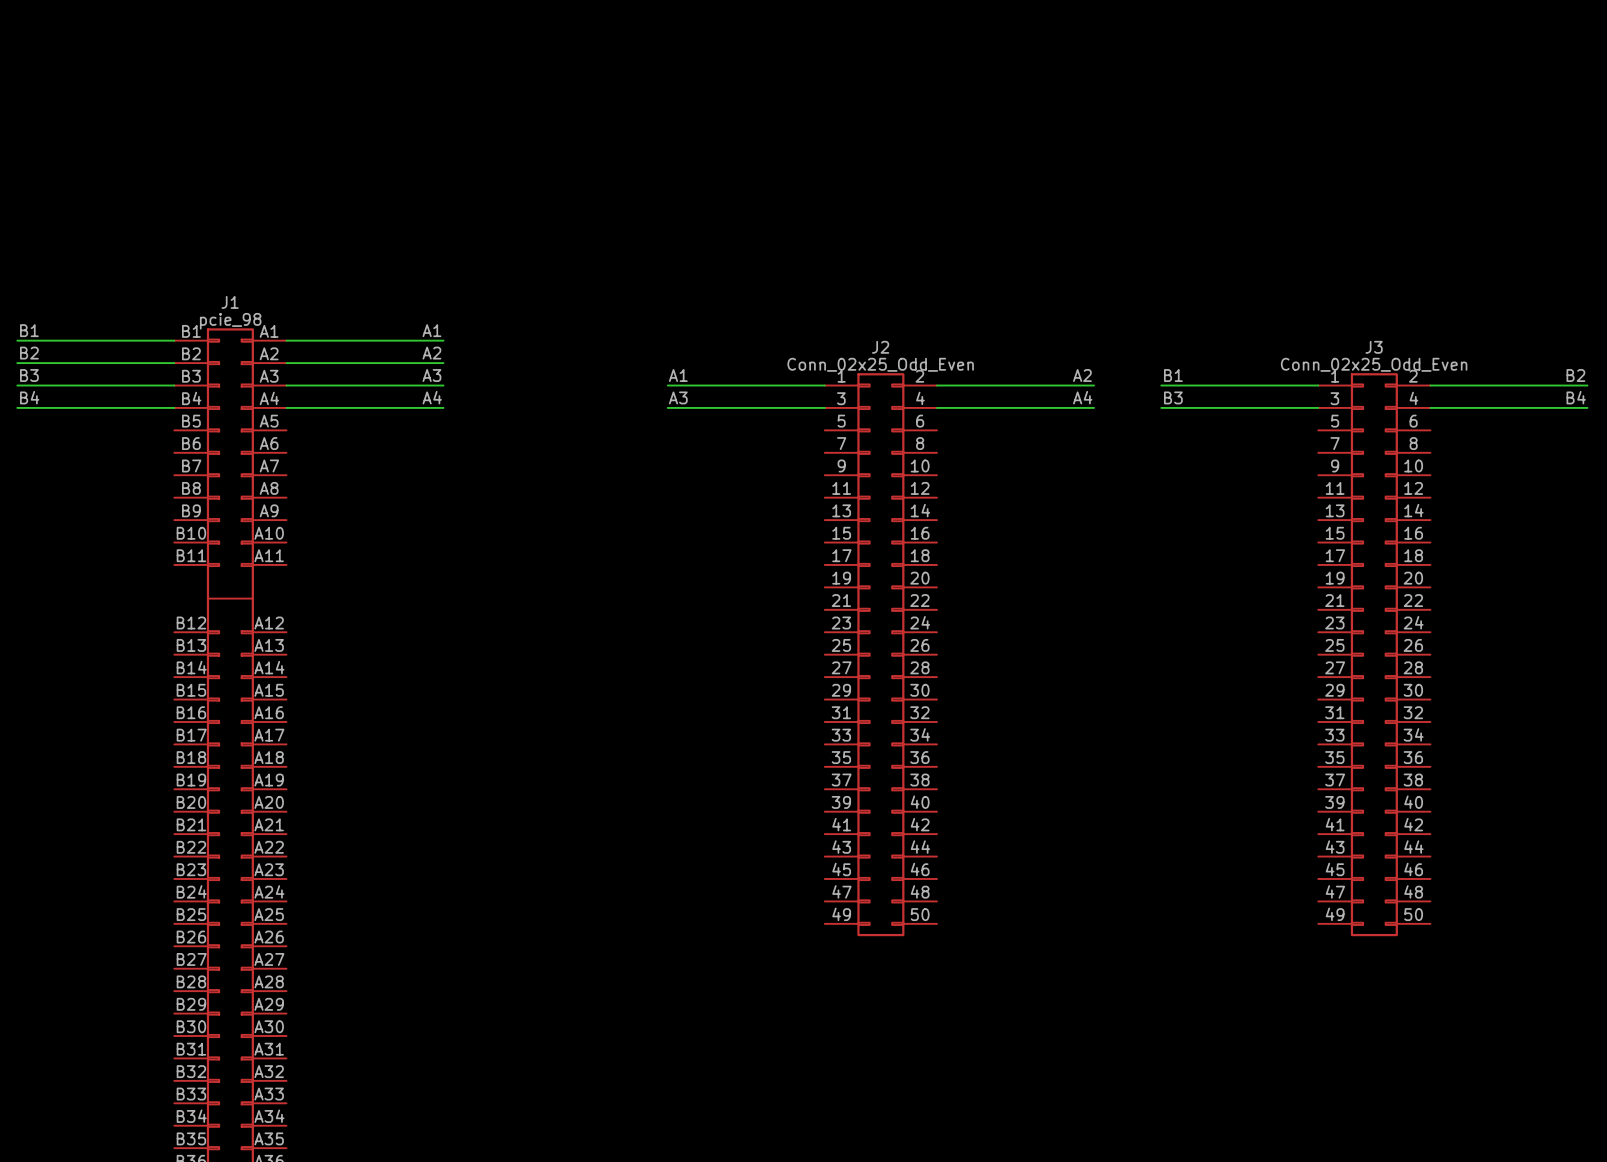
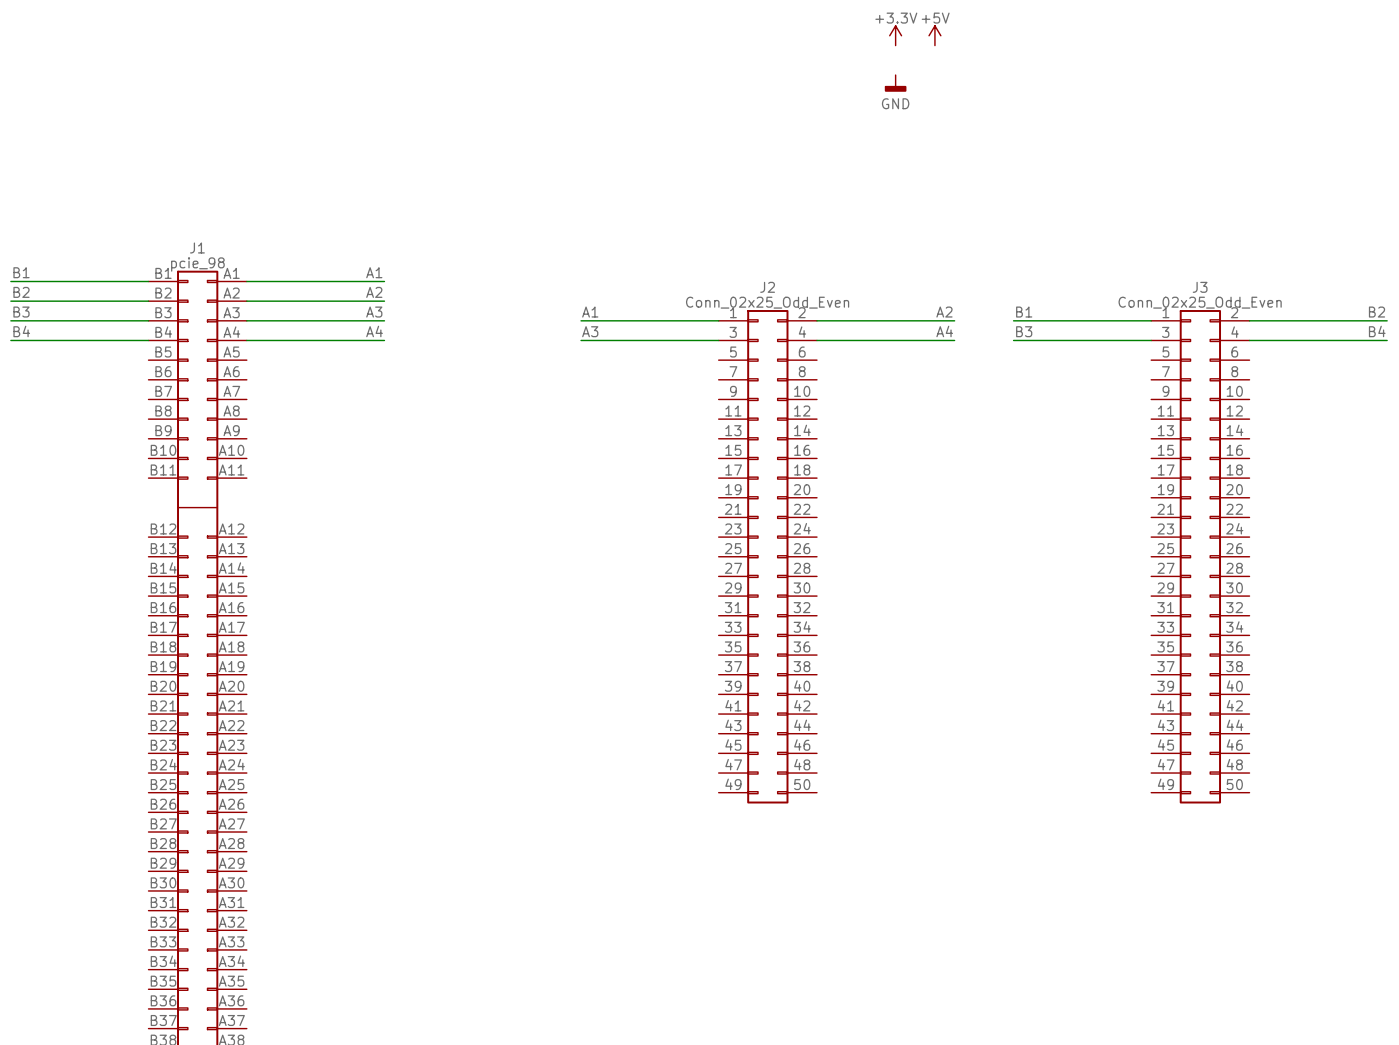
power symbol: none -> +3.3V (895, 35)
power symbol: none -> +5V (934, 35)
power symbol: none -> GND (895, 83)

